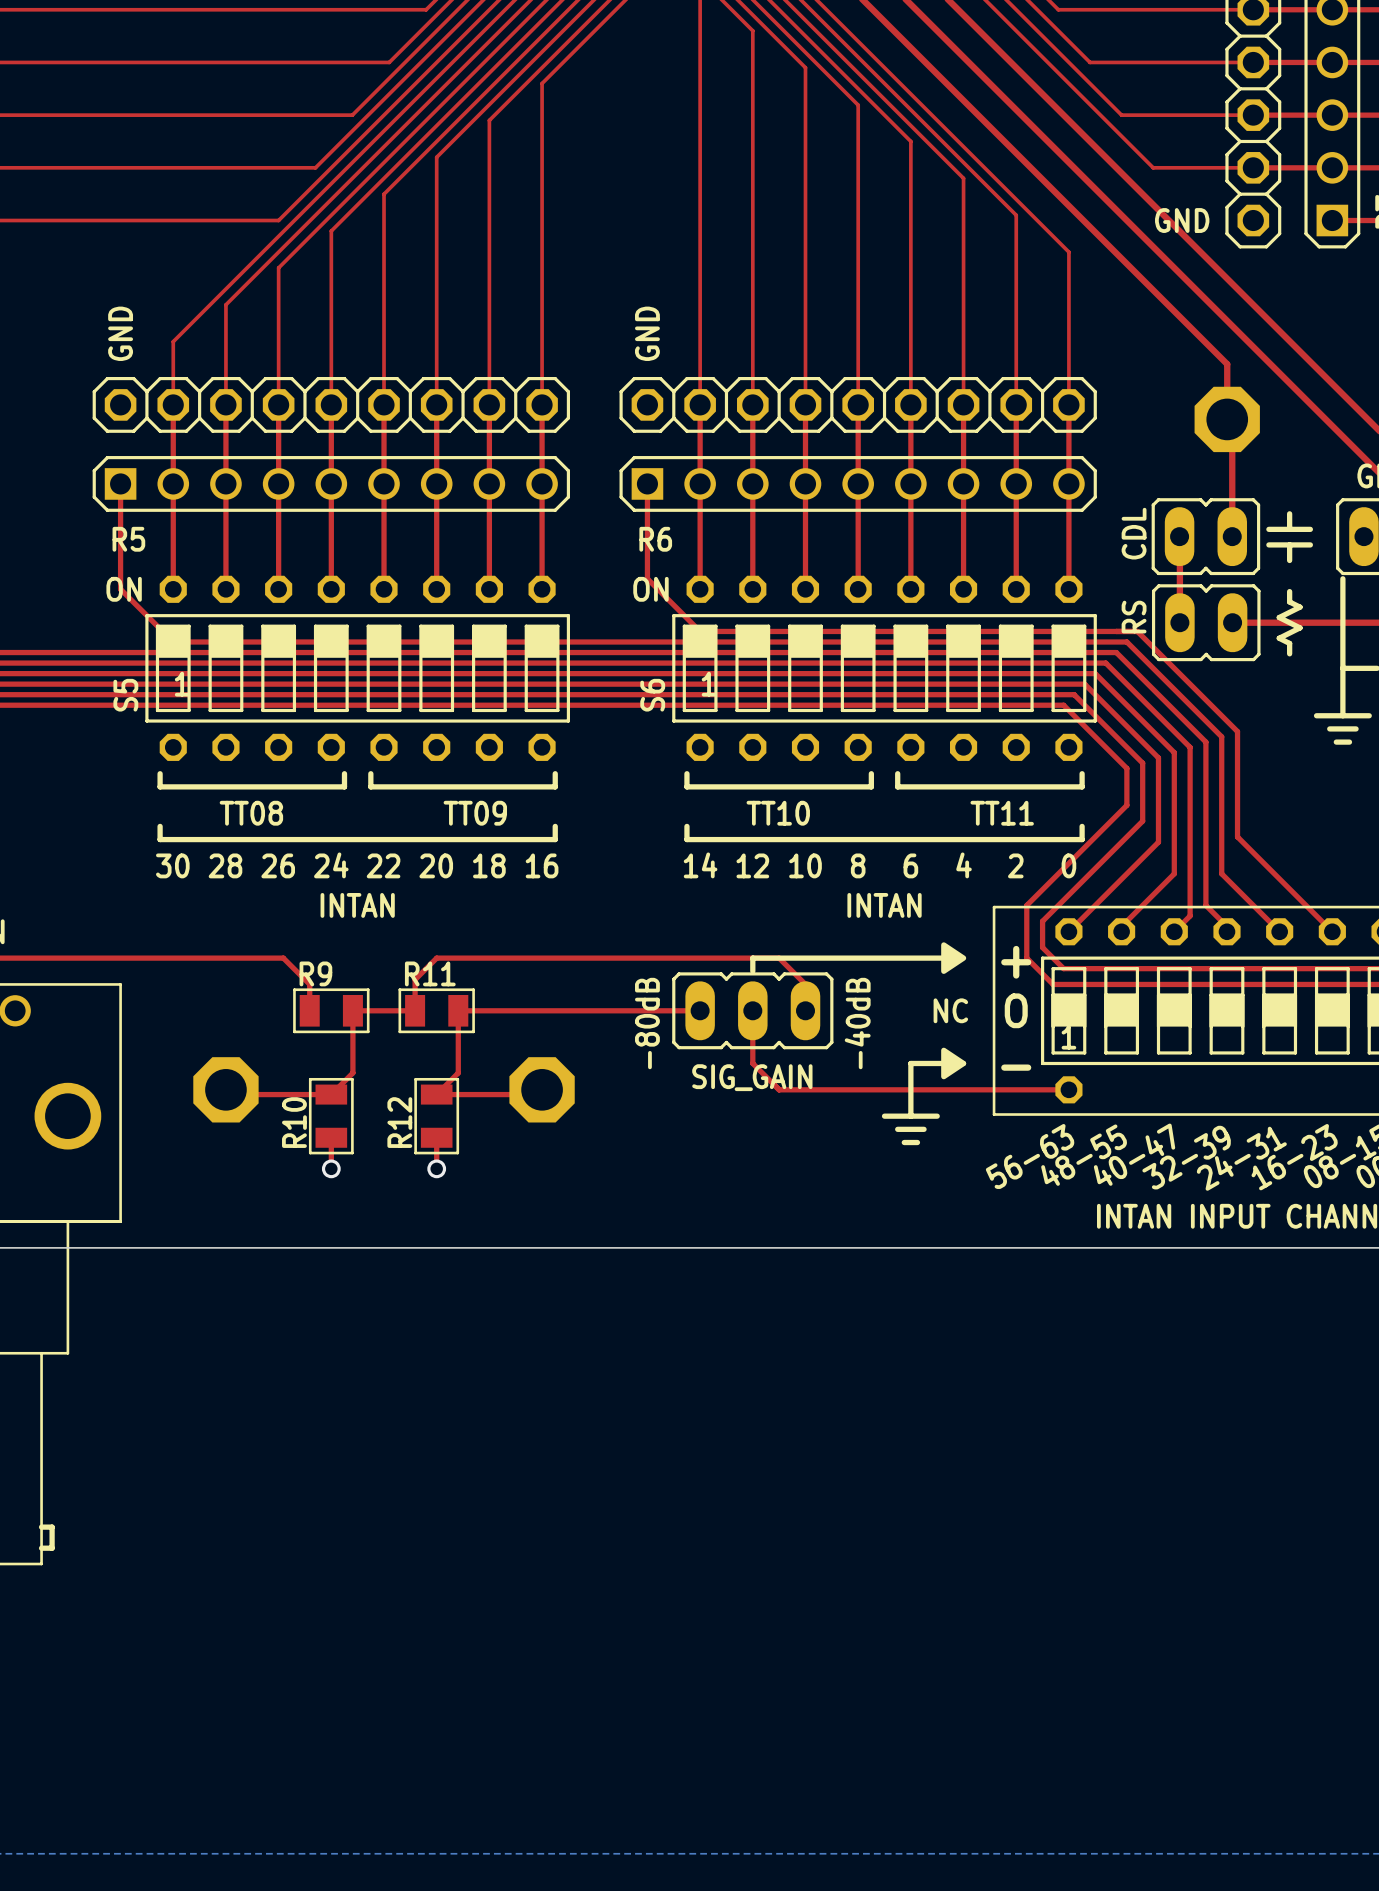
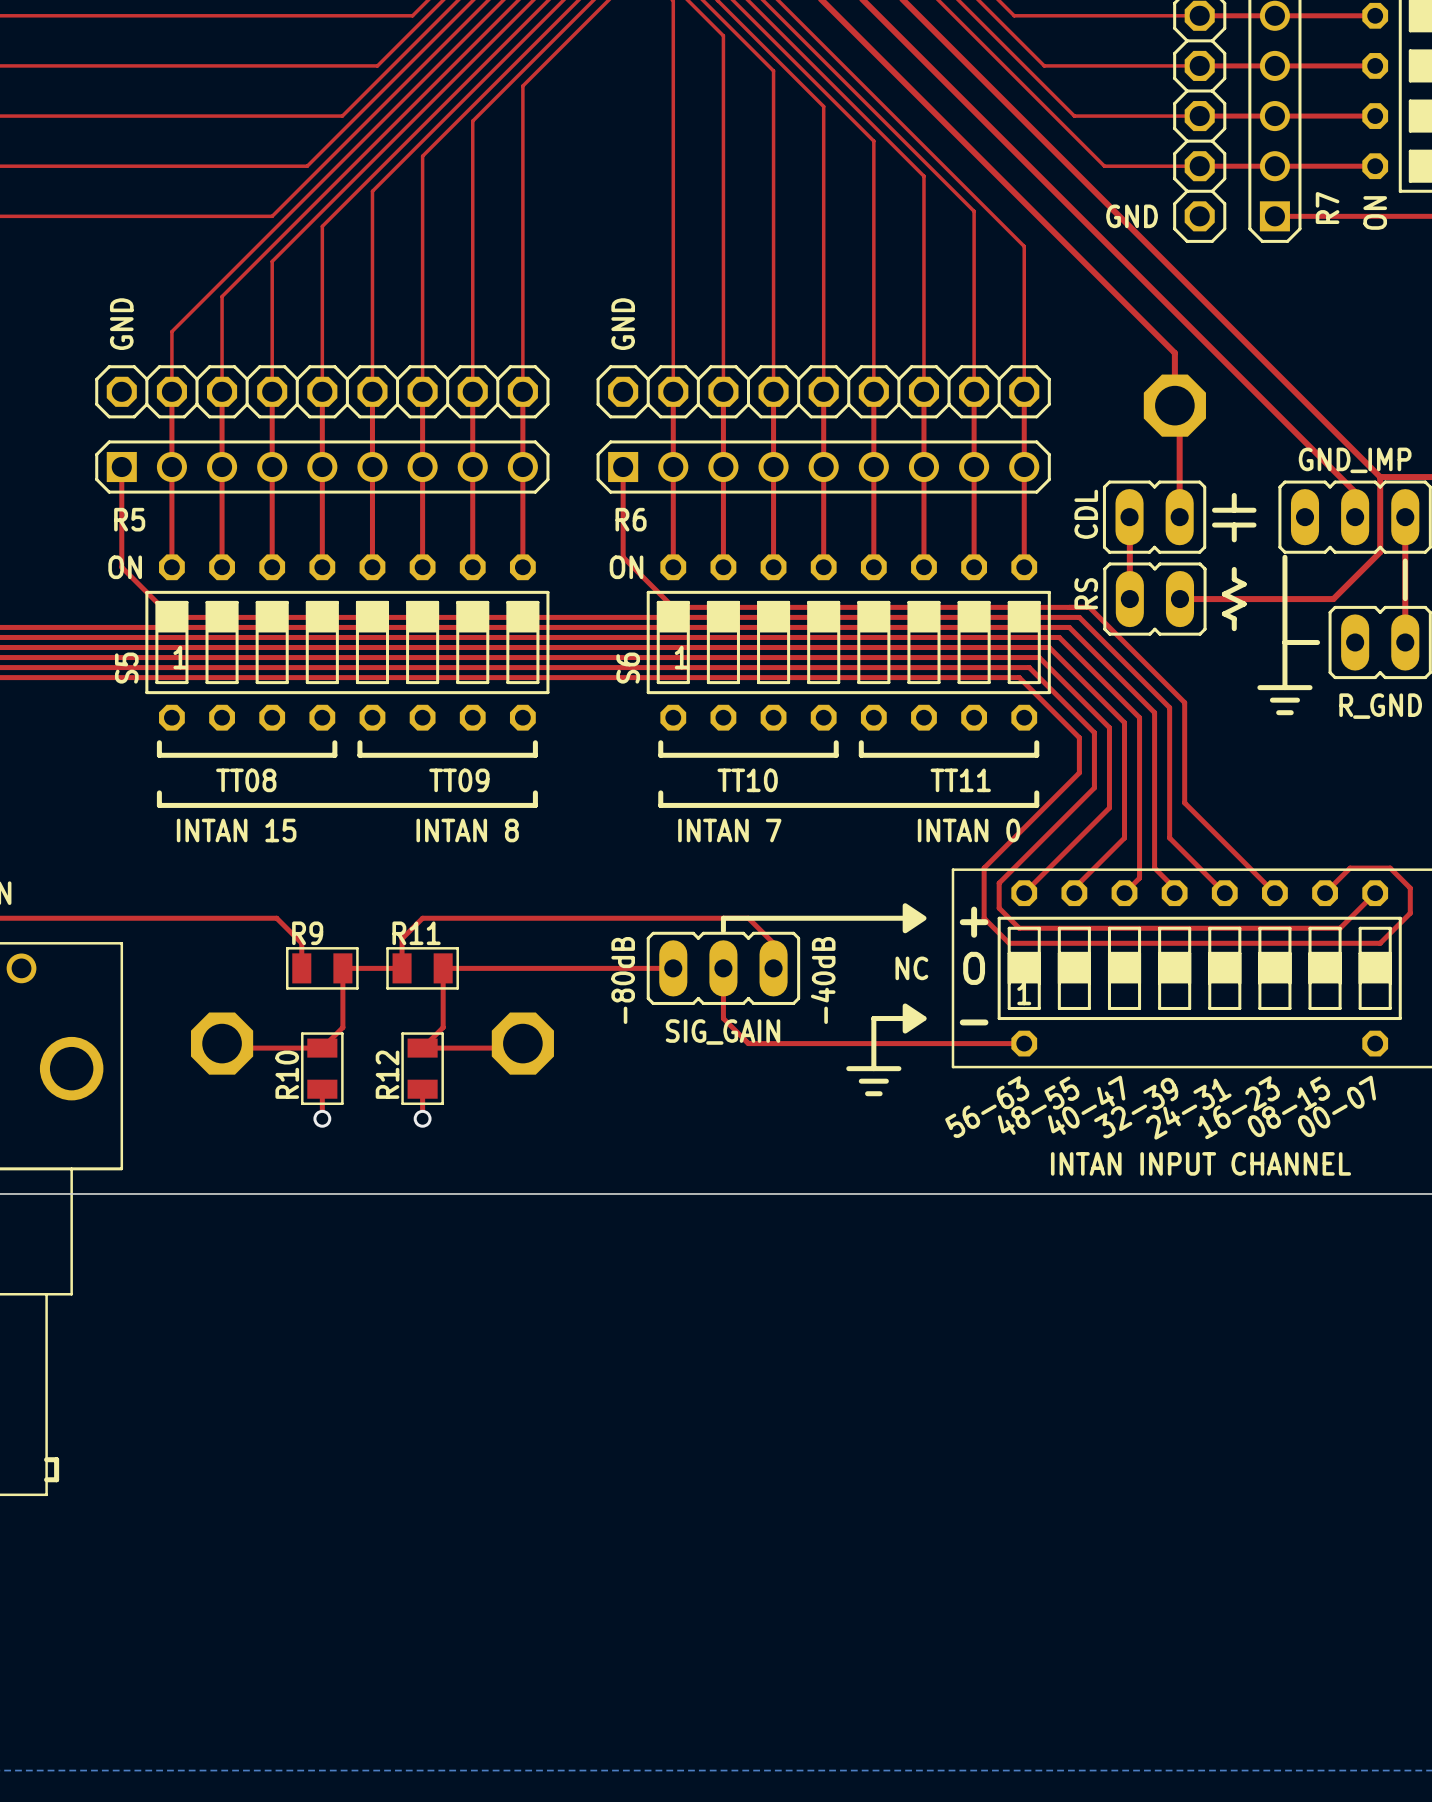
text: 30 (172, 865) -> INTAN 15 (236, 830)
text: 28 (225, 865) -> none
text: 26 (278, 865) -> none
text: 24 (331, 865) -> none
text: 22 (383, 865) -> none
text: 20 (436, 865) -> none
text: 18 (489, 865) -> none
text: 16 (542, 865) -> INTAN 8 (467, 830)
text: 14 (700, 865) -> INTAN 7 (729, 830)
text: 12 (752, 865) -> none
text: 10 (805, 865) -> none
text: 8 (858, 865) -> none
text: 6 (910, 865) -> none
text: 4 (964, 865) -> none
text: 2 (1015, 865) -> none
text: 0 (1068, 865) -> INTAN 0 (969, 830)
text: INTAN (357, 905) -> none
text: INTAN (884, 905) -> none

